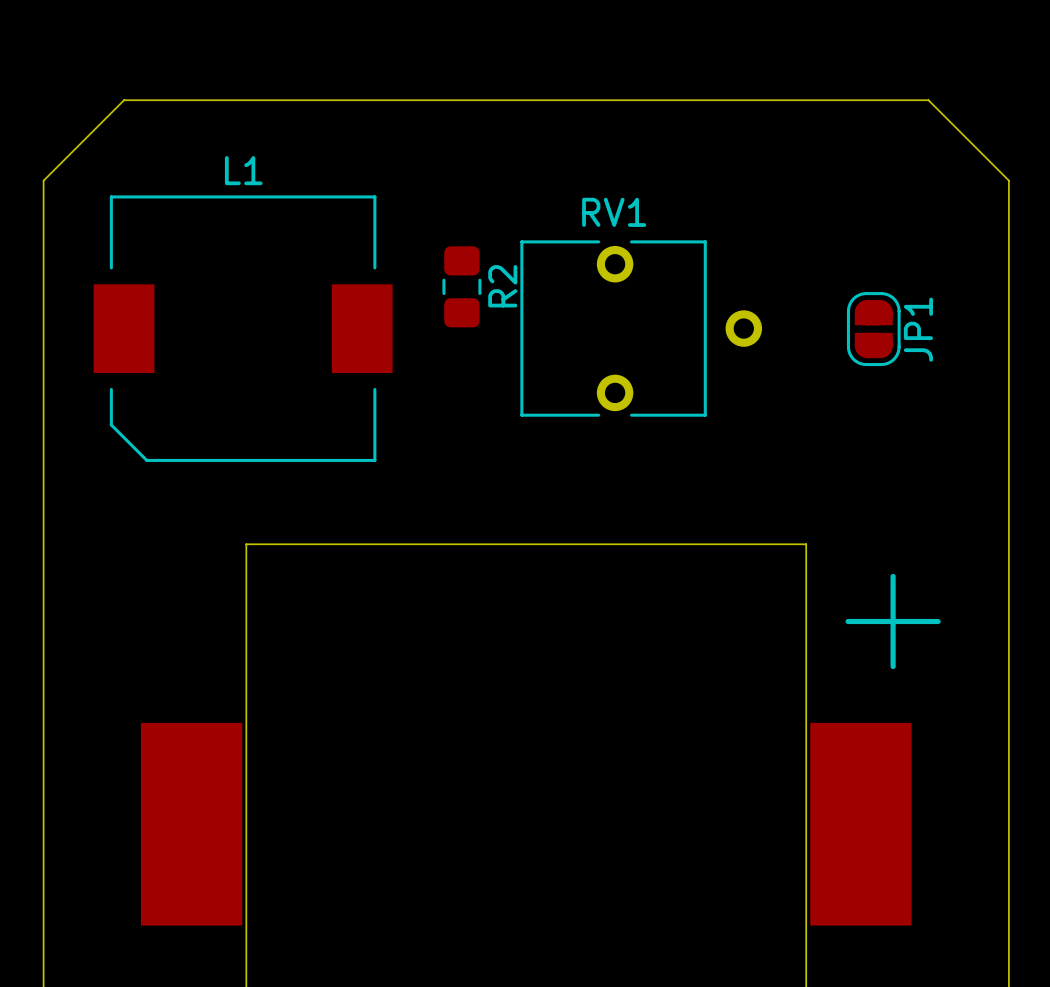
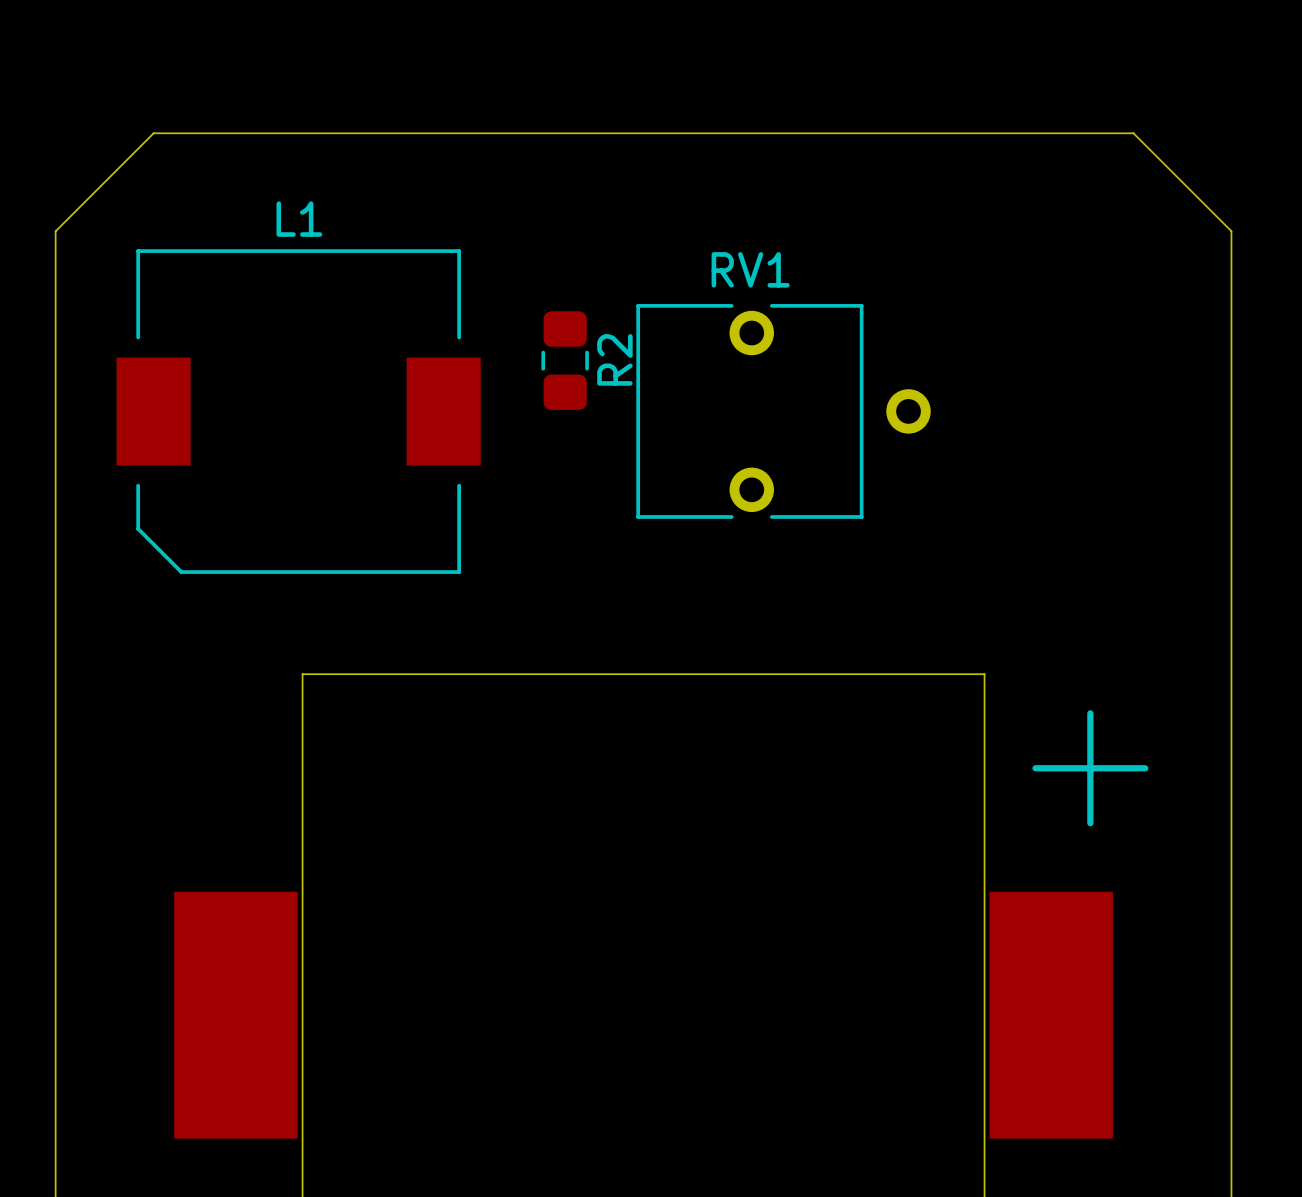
JP1: (873, 329) -> none

